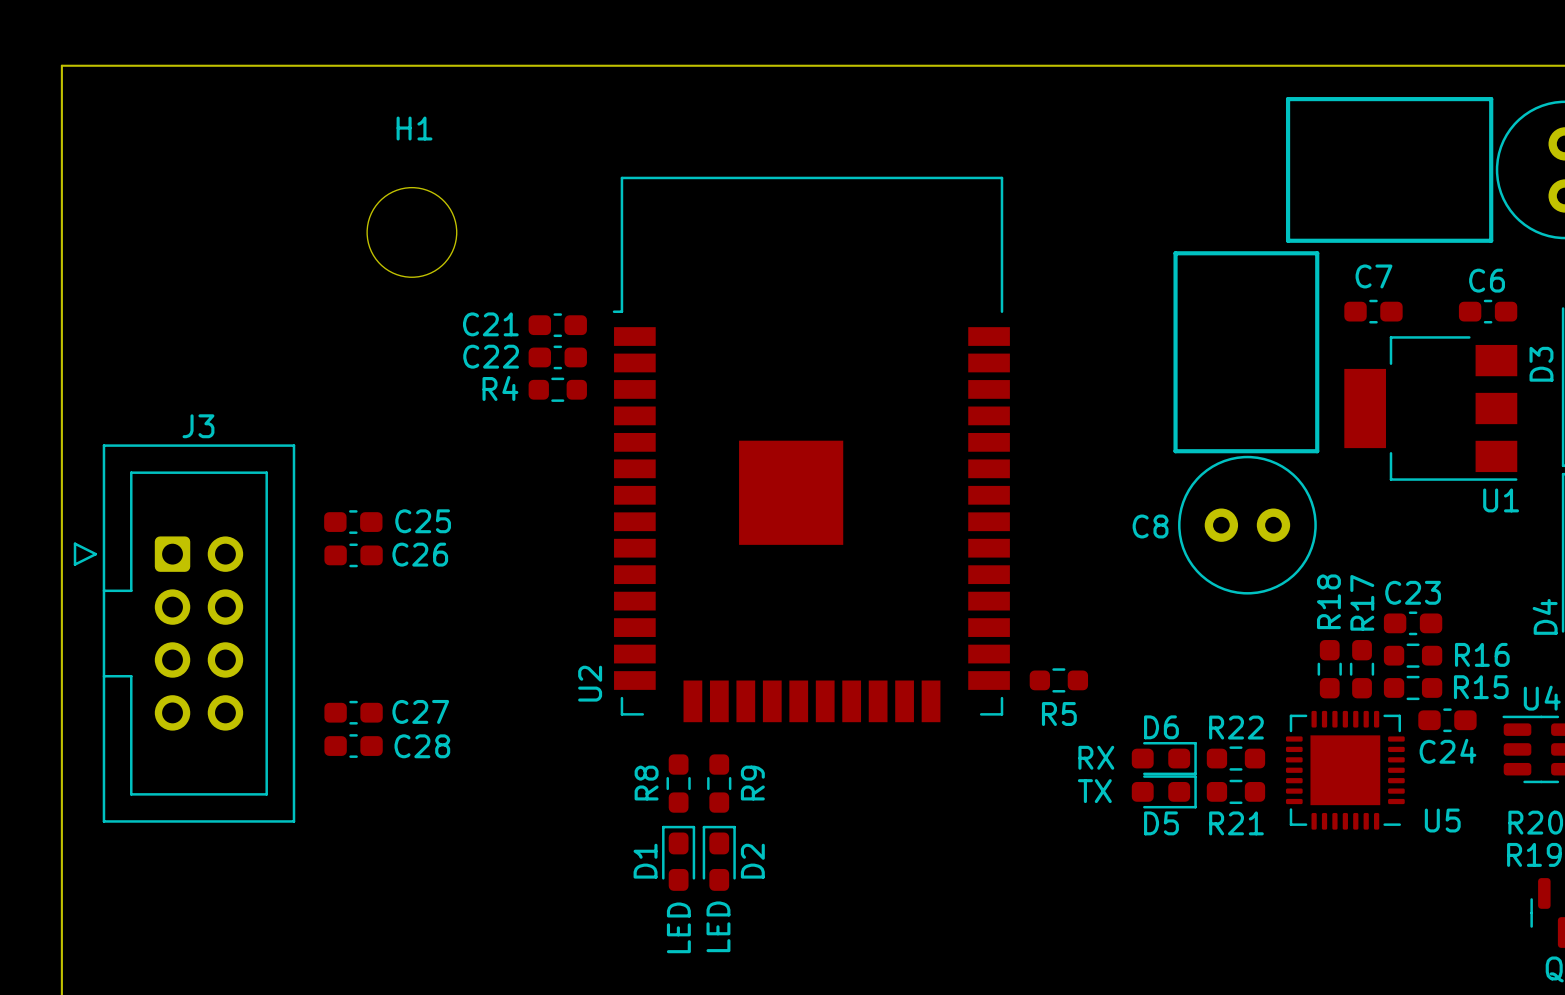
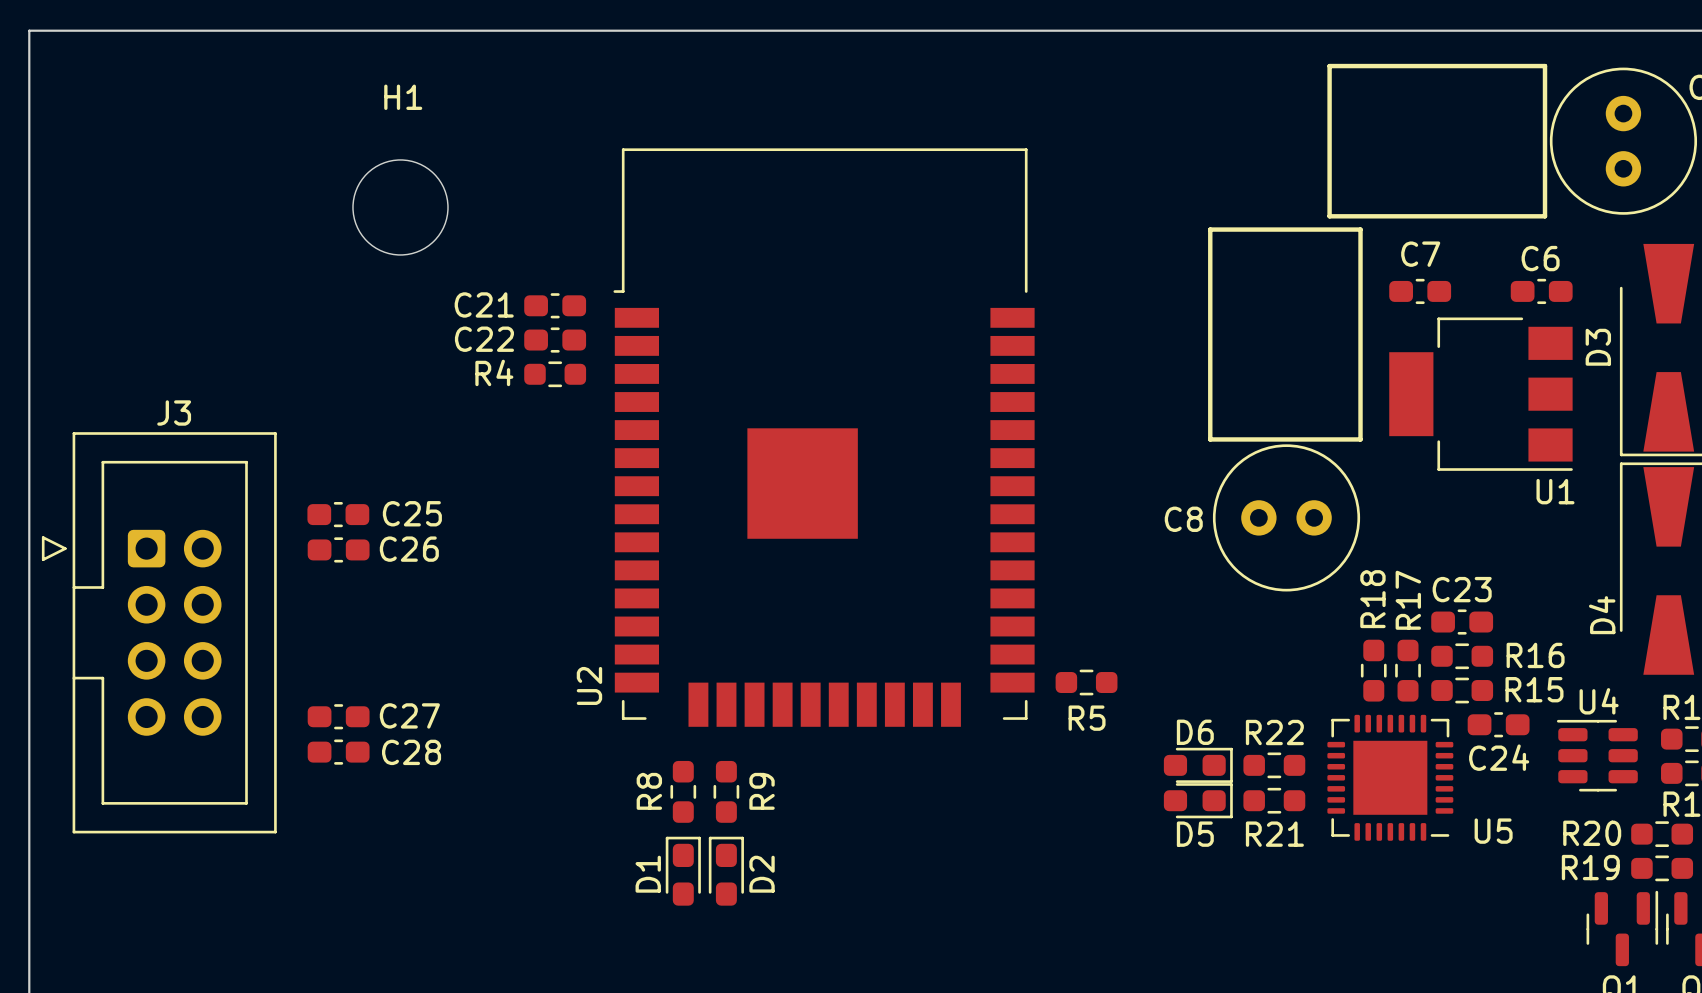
D6 value: RX (1096, 757) -> none
D5 value: TX (1094, 791) -> none
D2 value: LED (718, 926) -> none
D1 value: LED (678, 927) -> none

